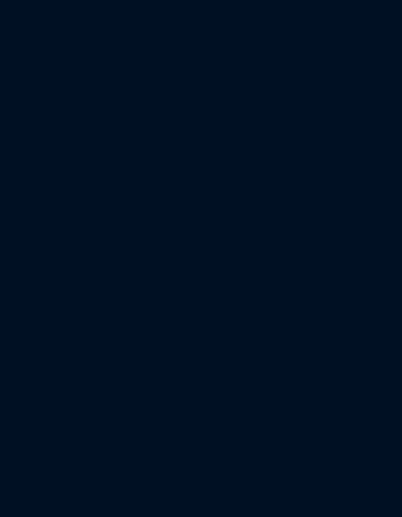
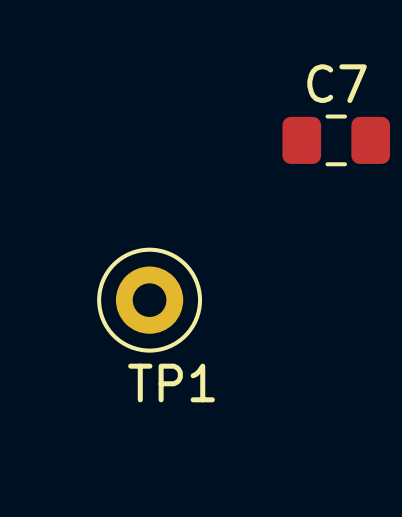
C7: none -> (336, 140)
TP1: none -> (149, 300)

